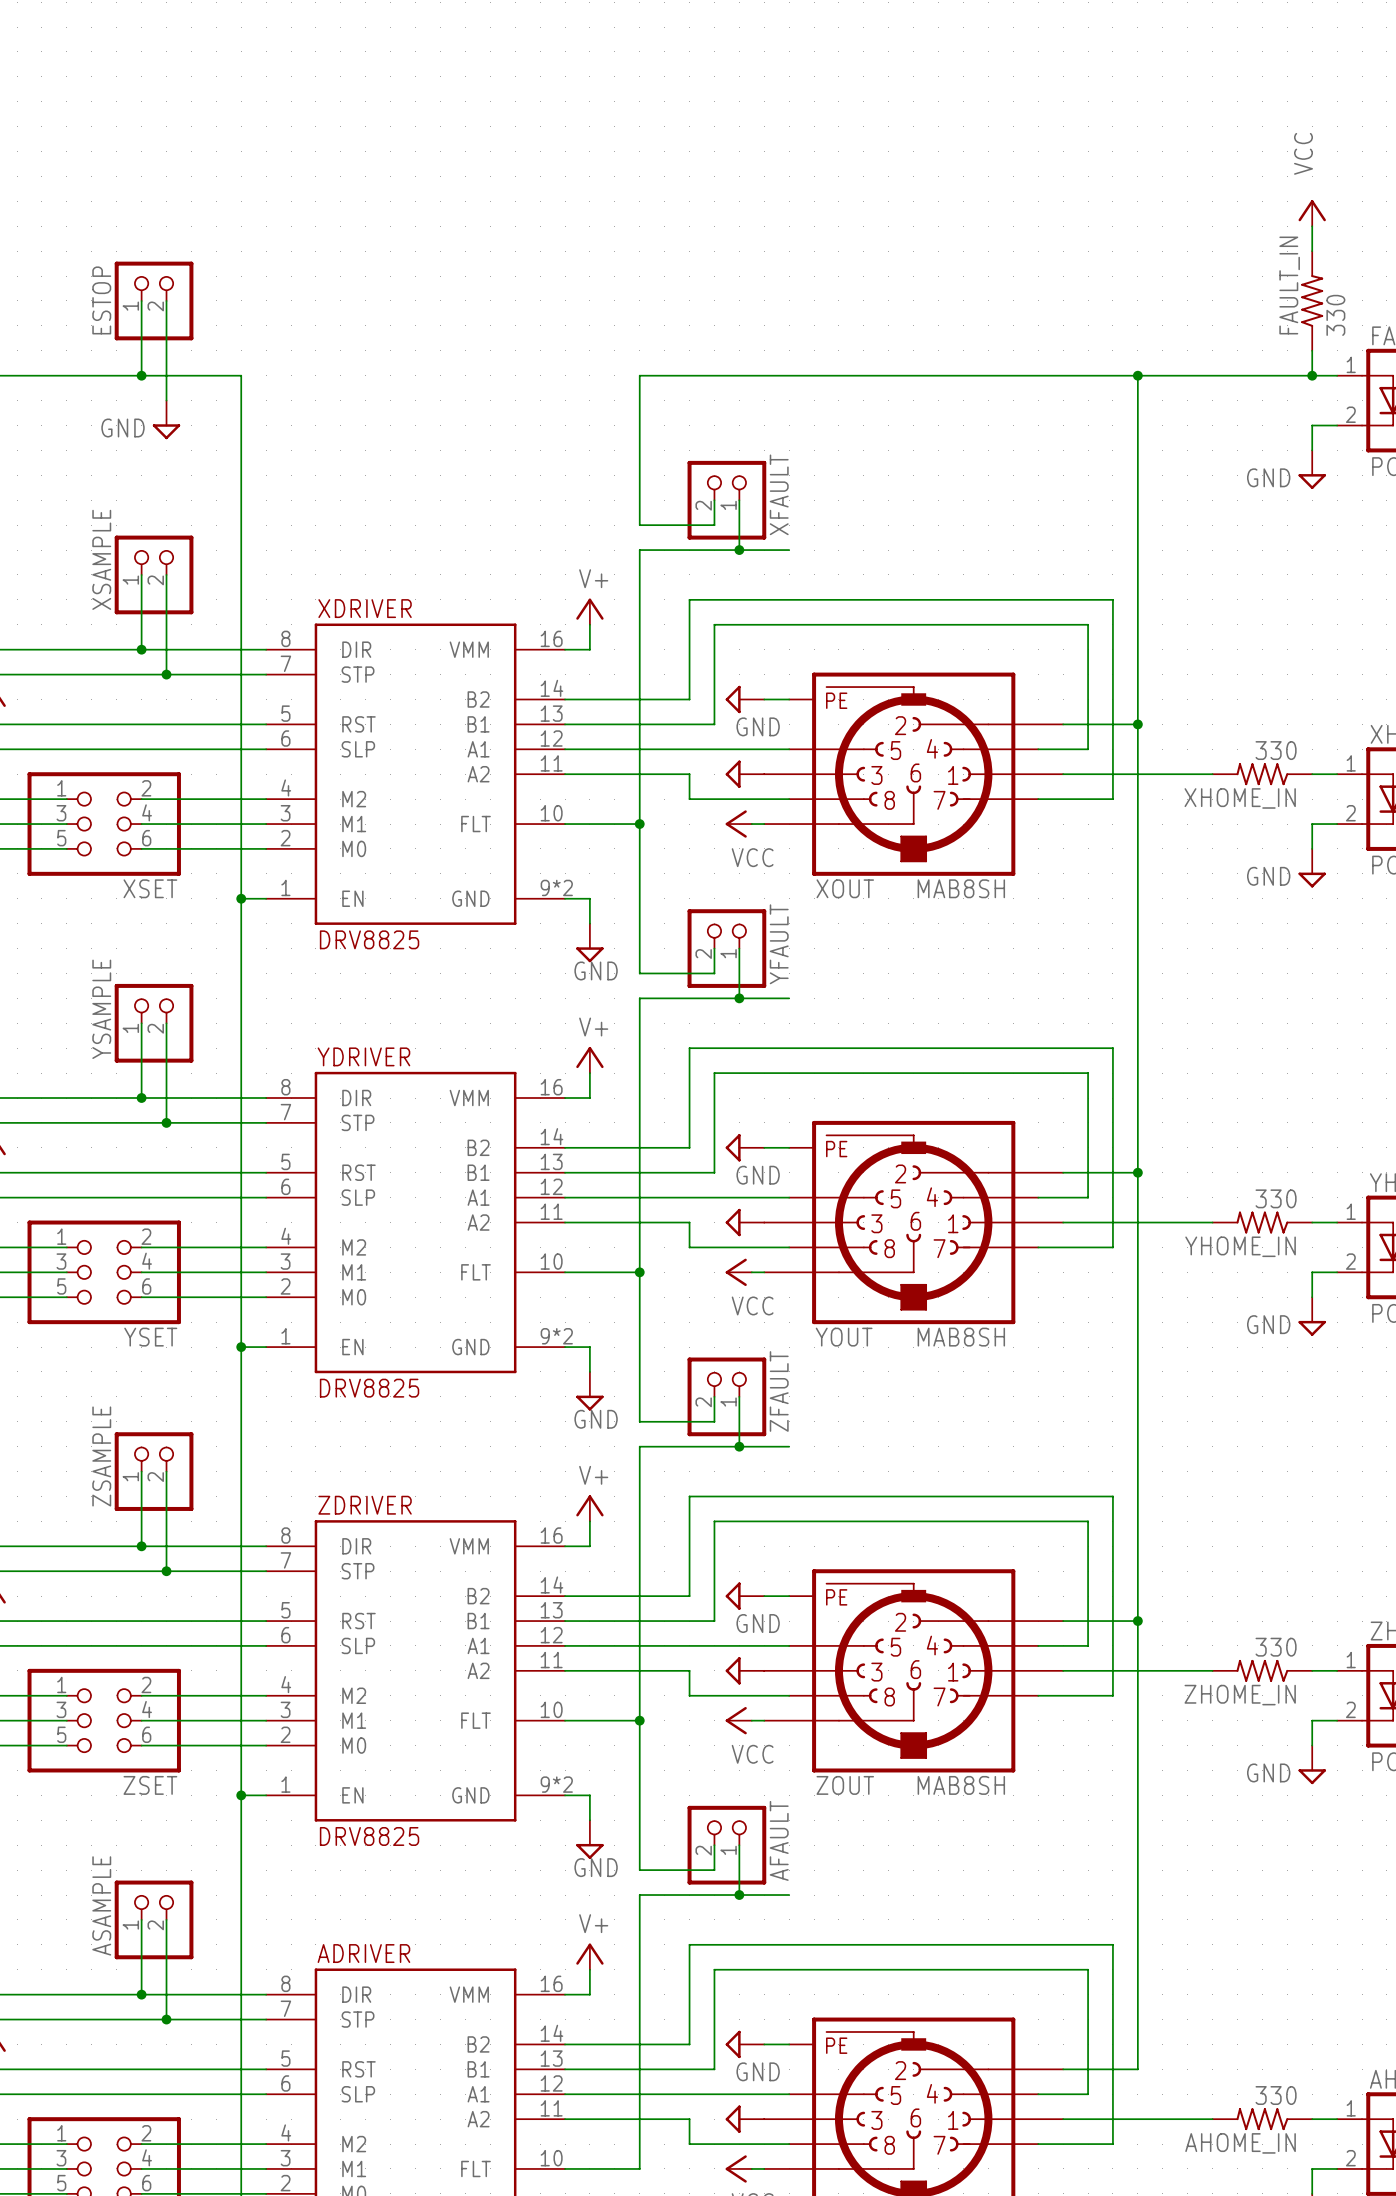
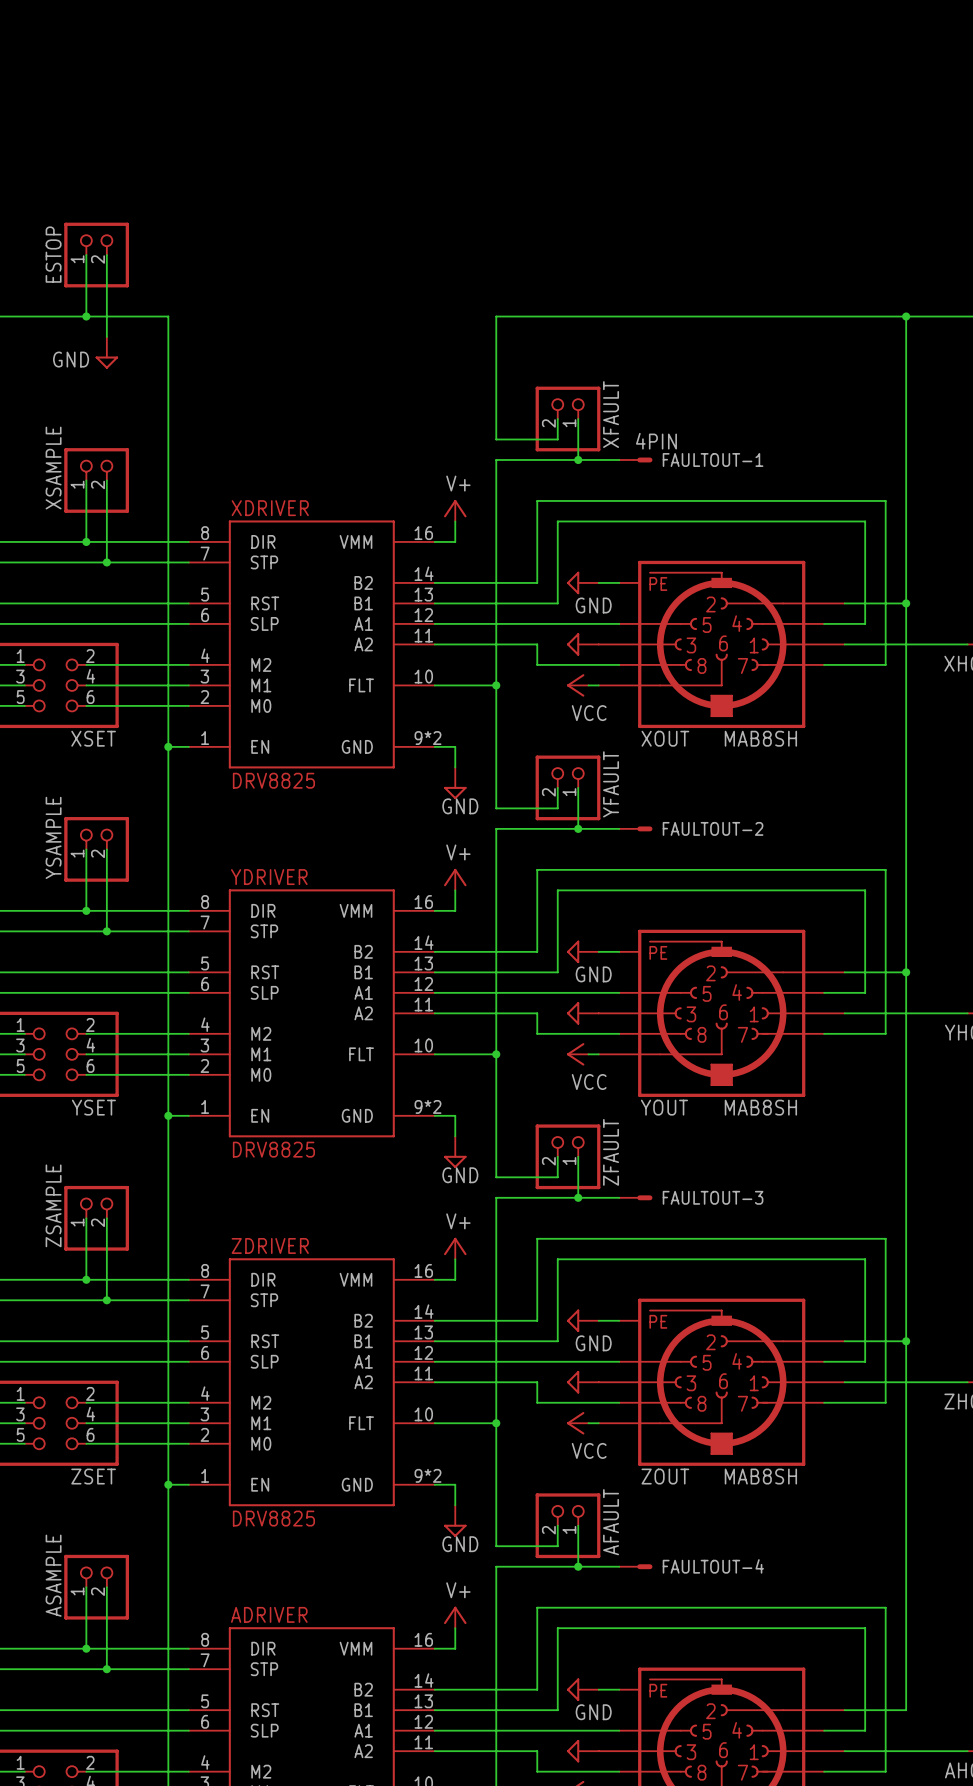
FAULTOUT-1: none -> 4PIN (635, 459)
FAULTOUT-2: none -> (635, 828)
FAULTOUT-3: none -> (635, 1197)
FAULTOUT-4: none -> (635, 1566)

